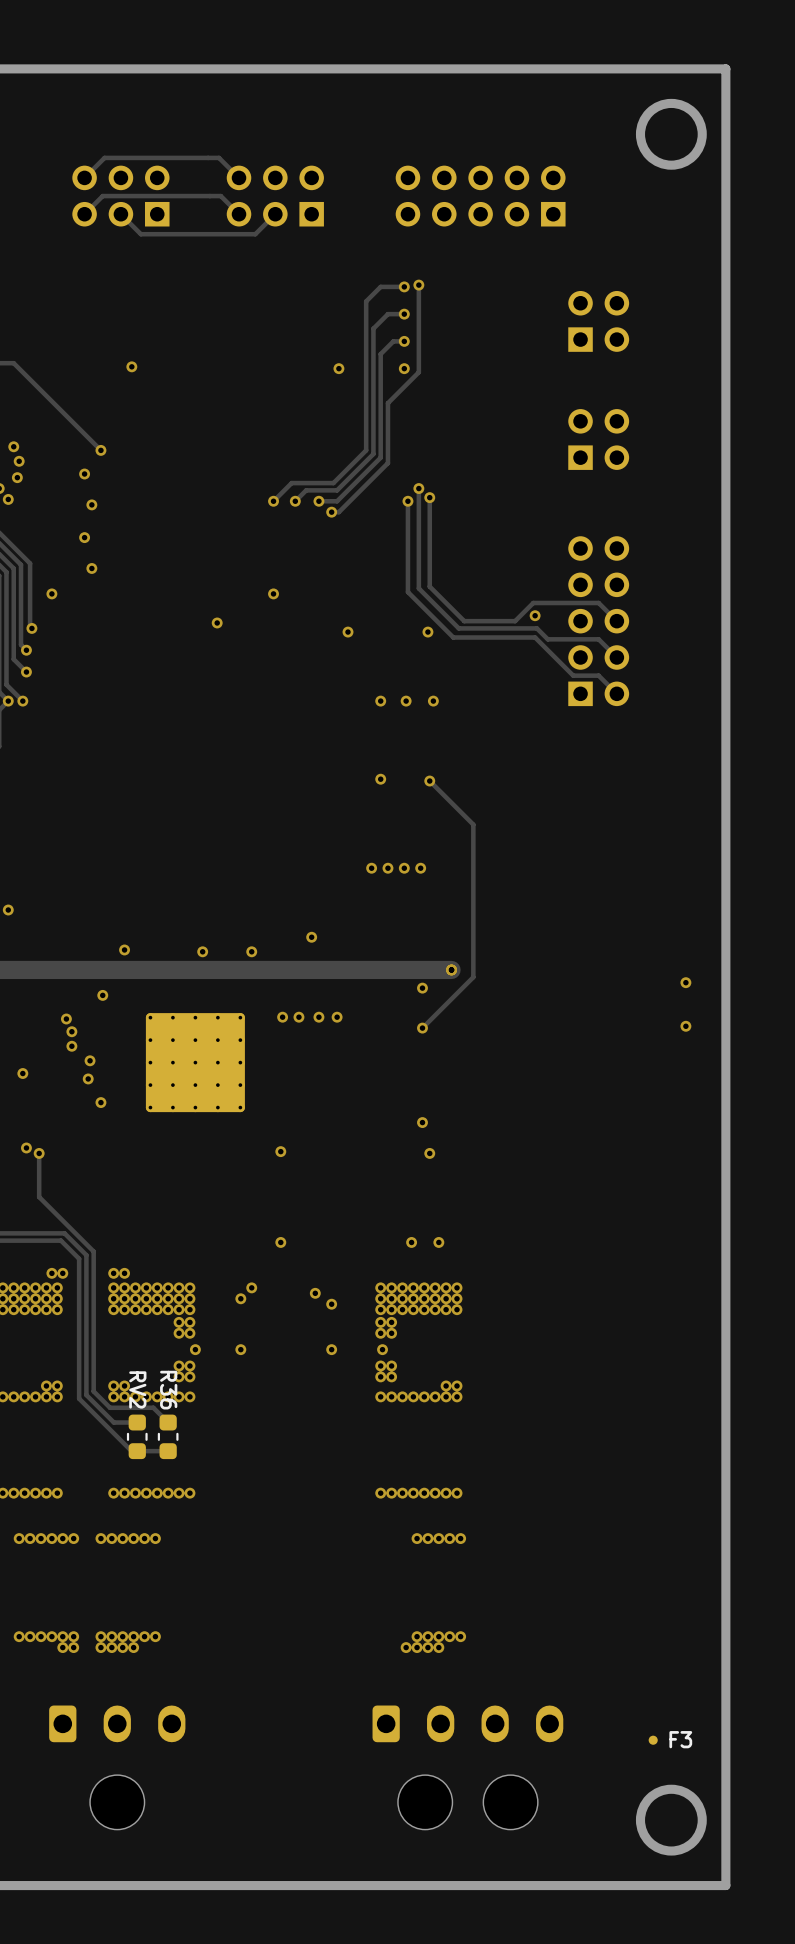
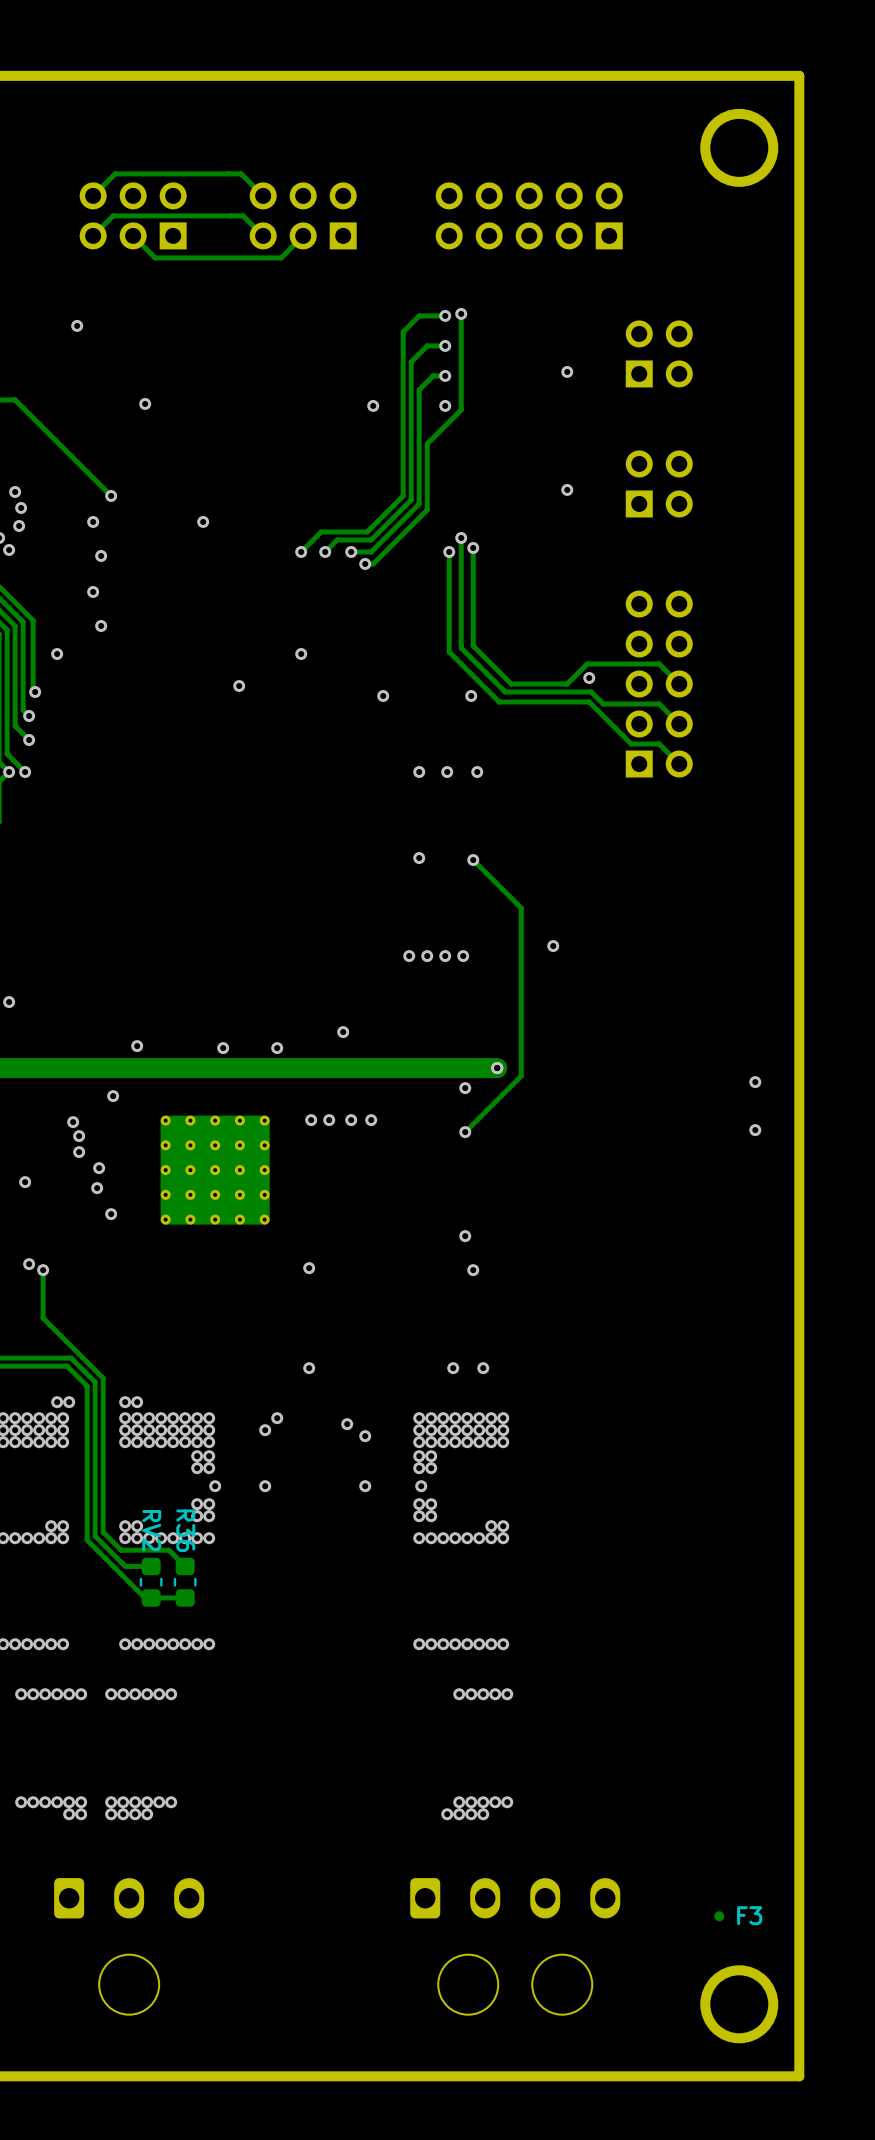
via: none -> (77, 325)
via: none -> (567, 371)
via: none -> (567, 489)
via: none -> (203, 521)
via: none -> (553, 946)

